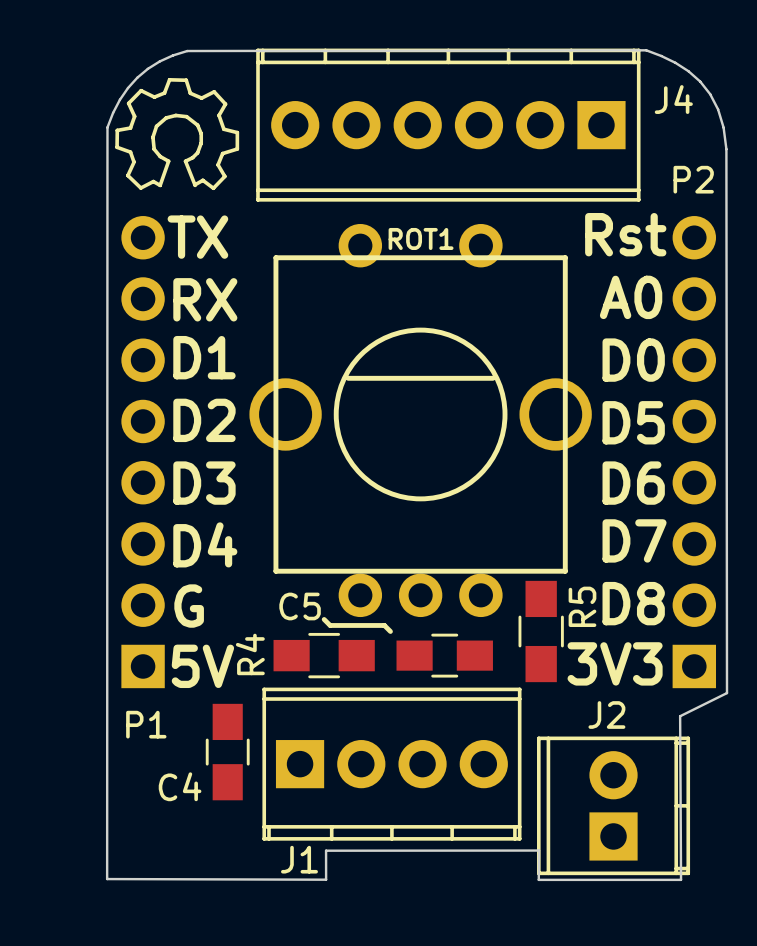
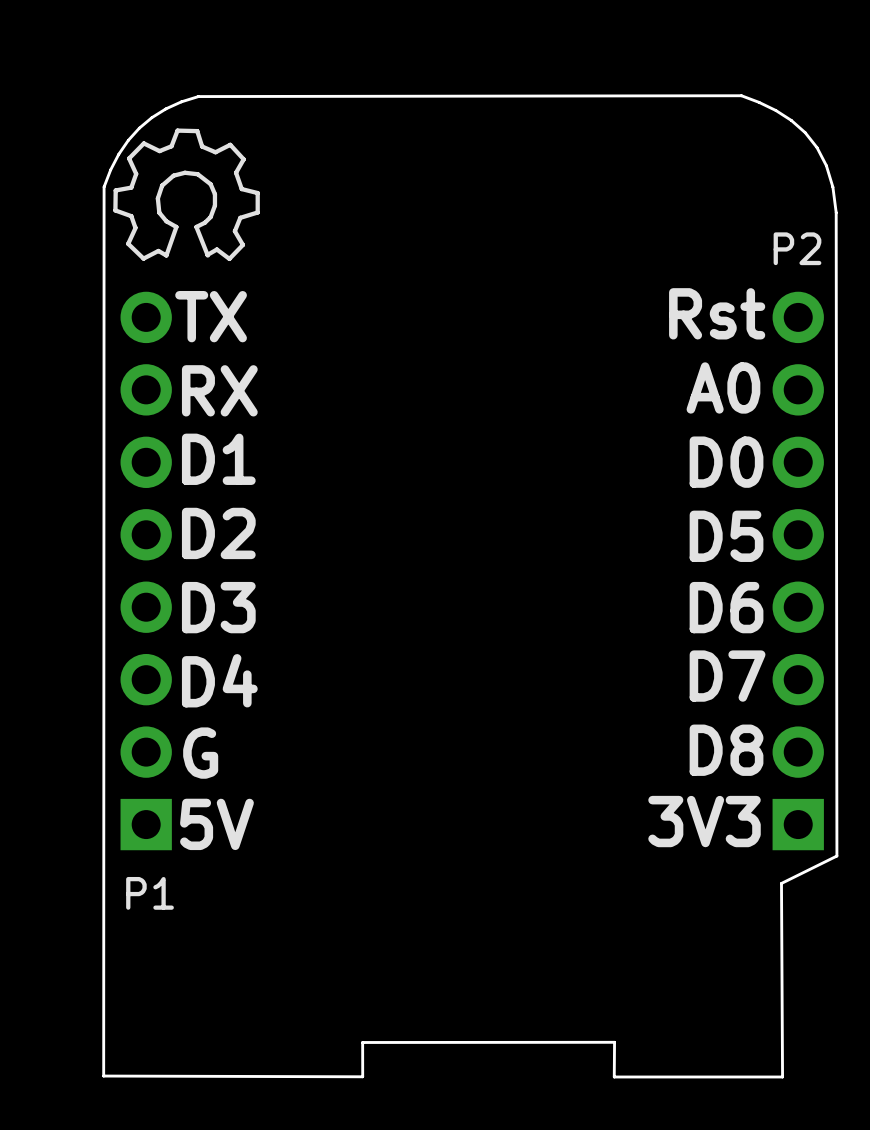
J4: (448, 125) -> none
ROT1: (420, 420) -> none
line: (324, 619) (330, 625) (384, 625) (390, 631) -> none
R5: (541, 631) -> none
R4: (324, 655) -> none
C5: (444, 655) -> none
C4: (227, 752) -> none
J1: (391, 764) -> none
J2: (613, 805) -> none

